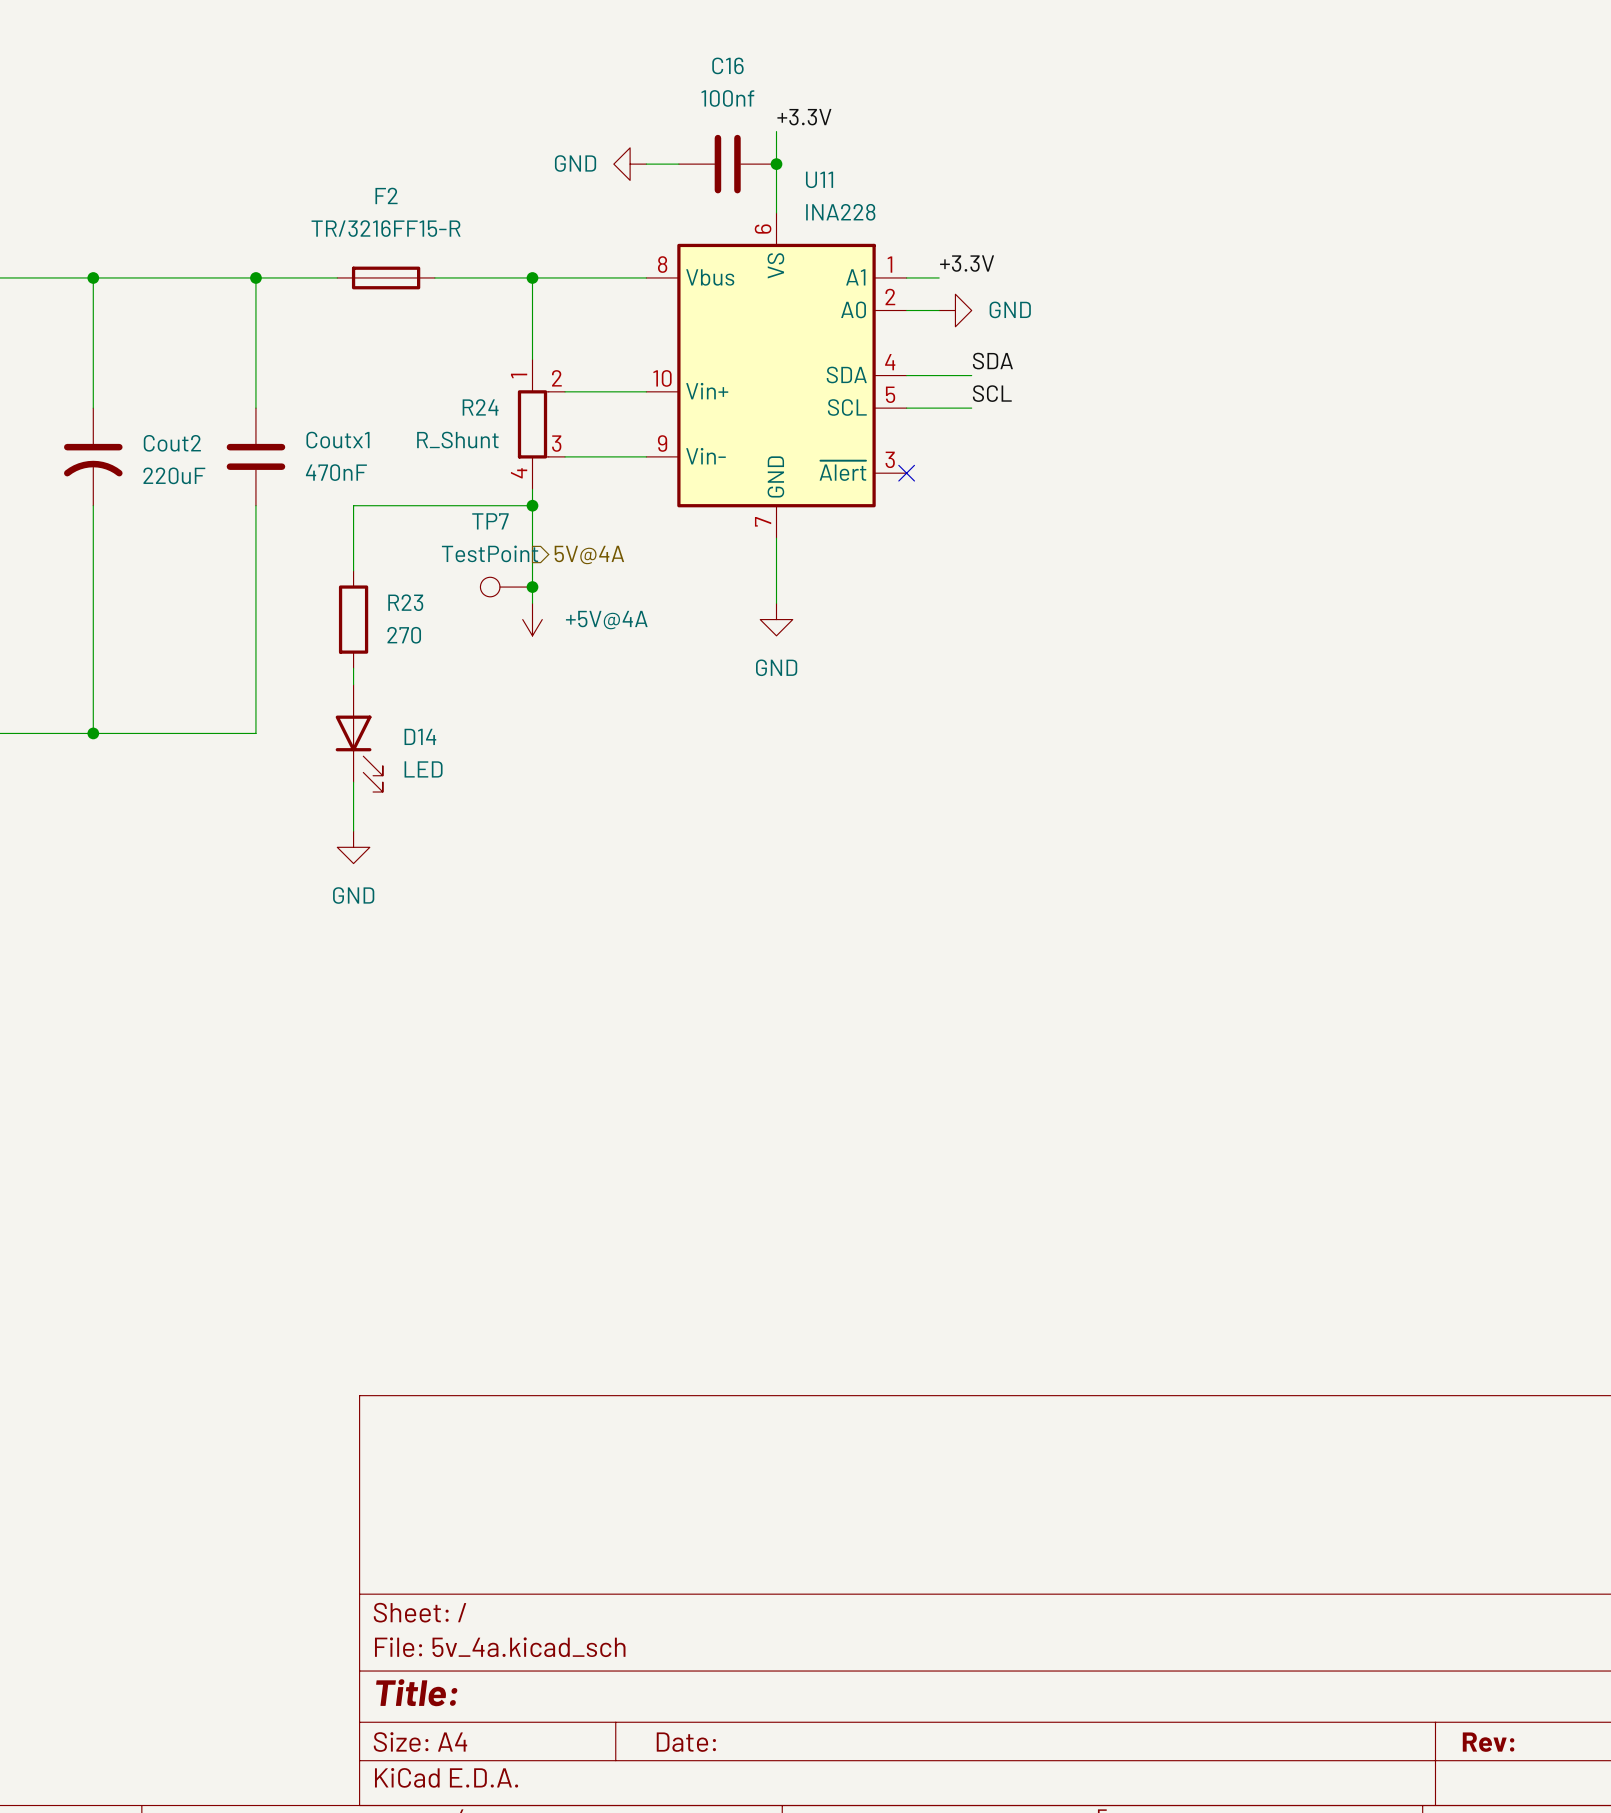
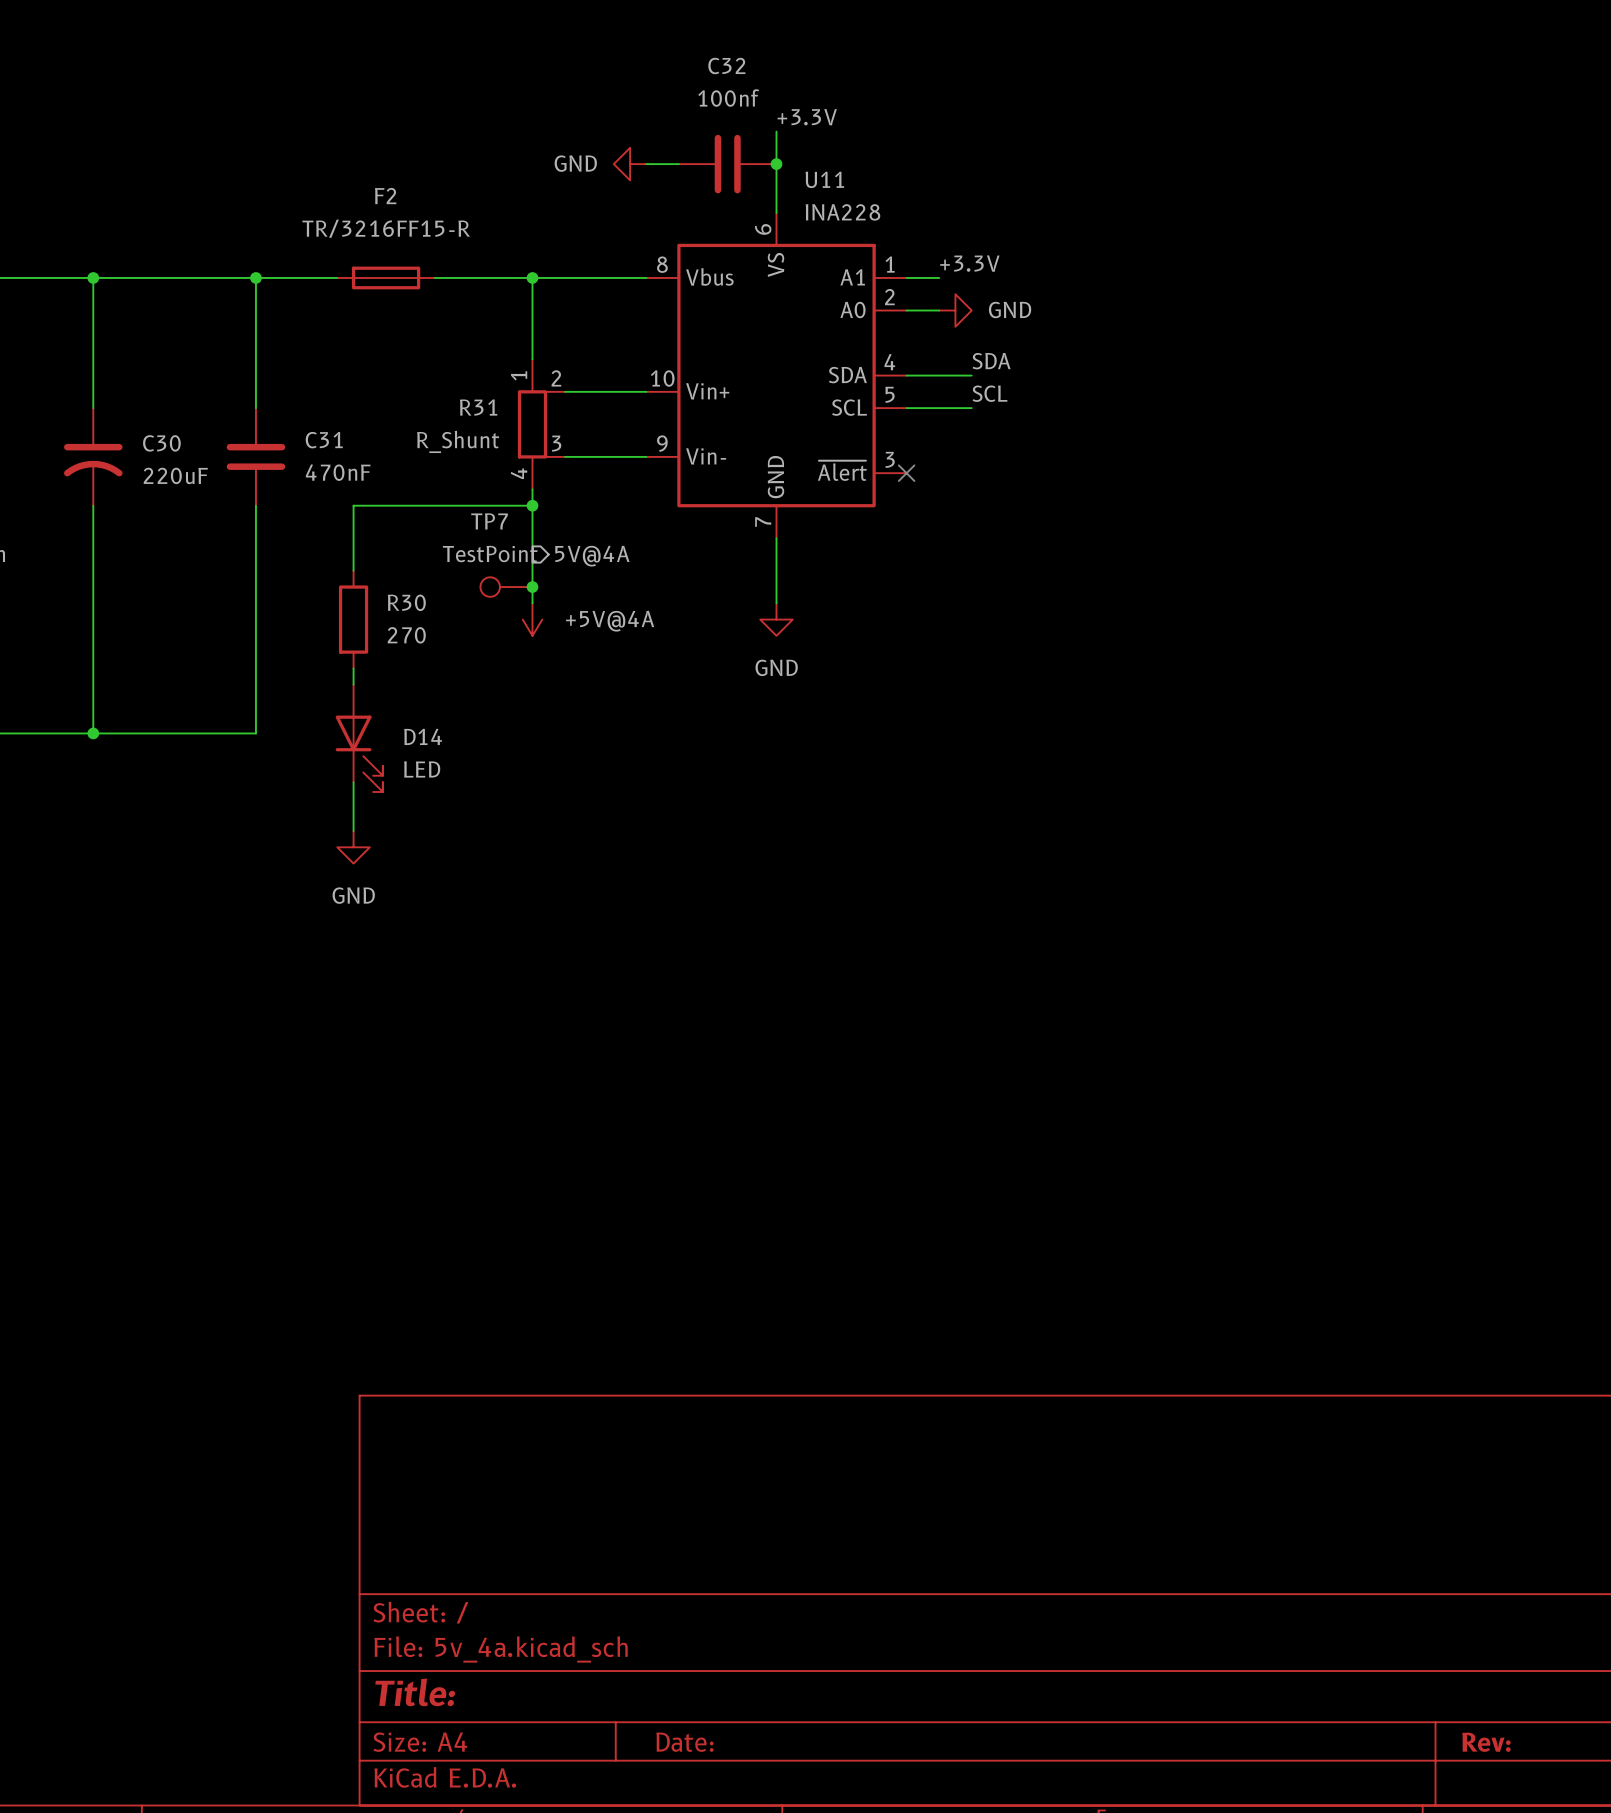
C16 name: C16 (727, 65) -> C32 (726, 66)
R24 name: R24 (480, 407) -> R31 (478, 407)
Coutx1 name: Coutx1 (337, 440) -> C31 (324, 440)
Cout2 name: Cout2 (172, 443) -> C30 (161, 443)
R23 name: R23 (405, 602) -> R30 (406, 602)

